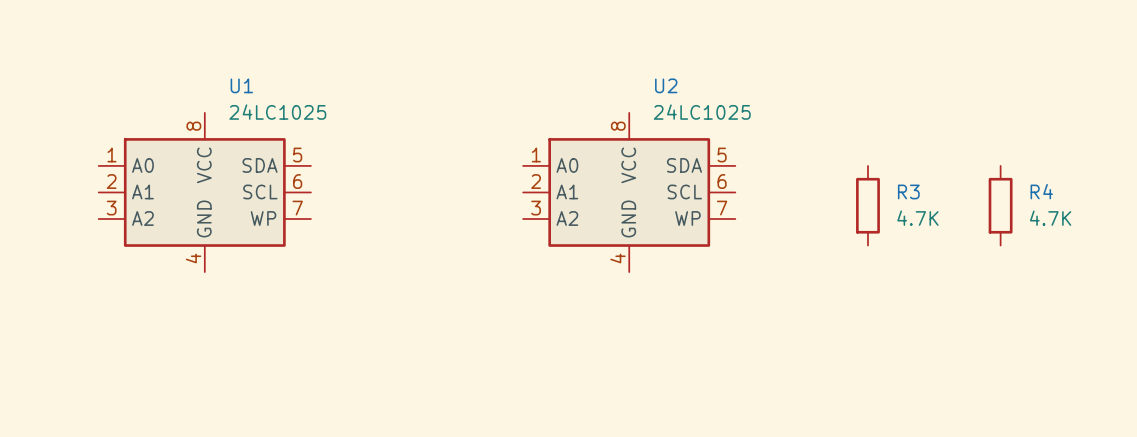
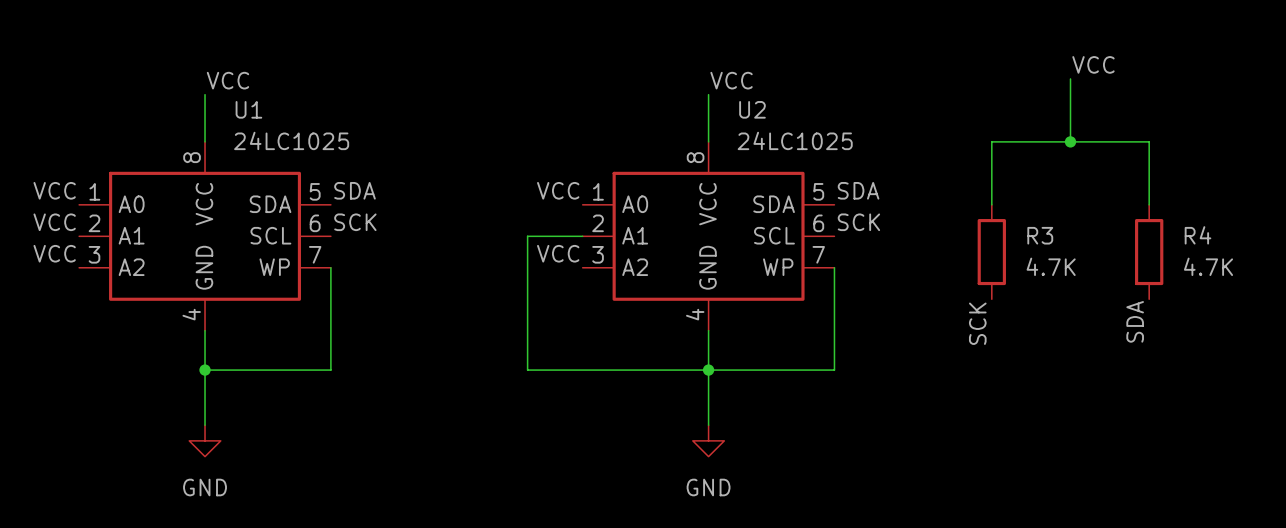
label: none -> VCC (1093, 64)
wire: none -> (1070, 78) (1070, 141)
label: none -> VCC (227, 80)
label: none -> VCC (731, 80)
wire: none -> (205, 94) (205, 141)
wire: none -> (708, 94) (708, 141)
junction: none -> (1070, 141)
label: none -> VCC (54, 190)
label: none -> SDA (355, 190)
label: none -> VCC (558, 190)
label: none -> SDA (858, 190)
wire: none -> (991, 204) (991, 141) (1149, 141) (1149, 204)
label: none -> VCC (54, 222)
label: none -> SCK (355, 222)
label: none -> SCK (858, 222)
wire: none -> (582, 236) (527, 236) (527, 370) (834, 370) (834, 267)
label: none -> VCC (54, 253)
label: none -> VCC (558, 253)
wire: none -> (330, 267) (330, 370) (205, 370)
label: none -> SDA (1135, 321)
label: none -> SCK (977, 323)
wire: none -> (205, 330) (205, 425)
wire: none -> (708, 330) (708, 425)
junction: none -> (205, 370)
junction: none -> (708, 370)
power symbol: none -> GND (205, 440)
power symbol: none -> GND (708, 440)

